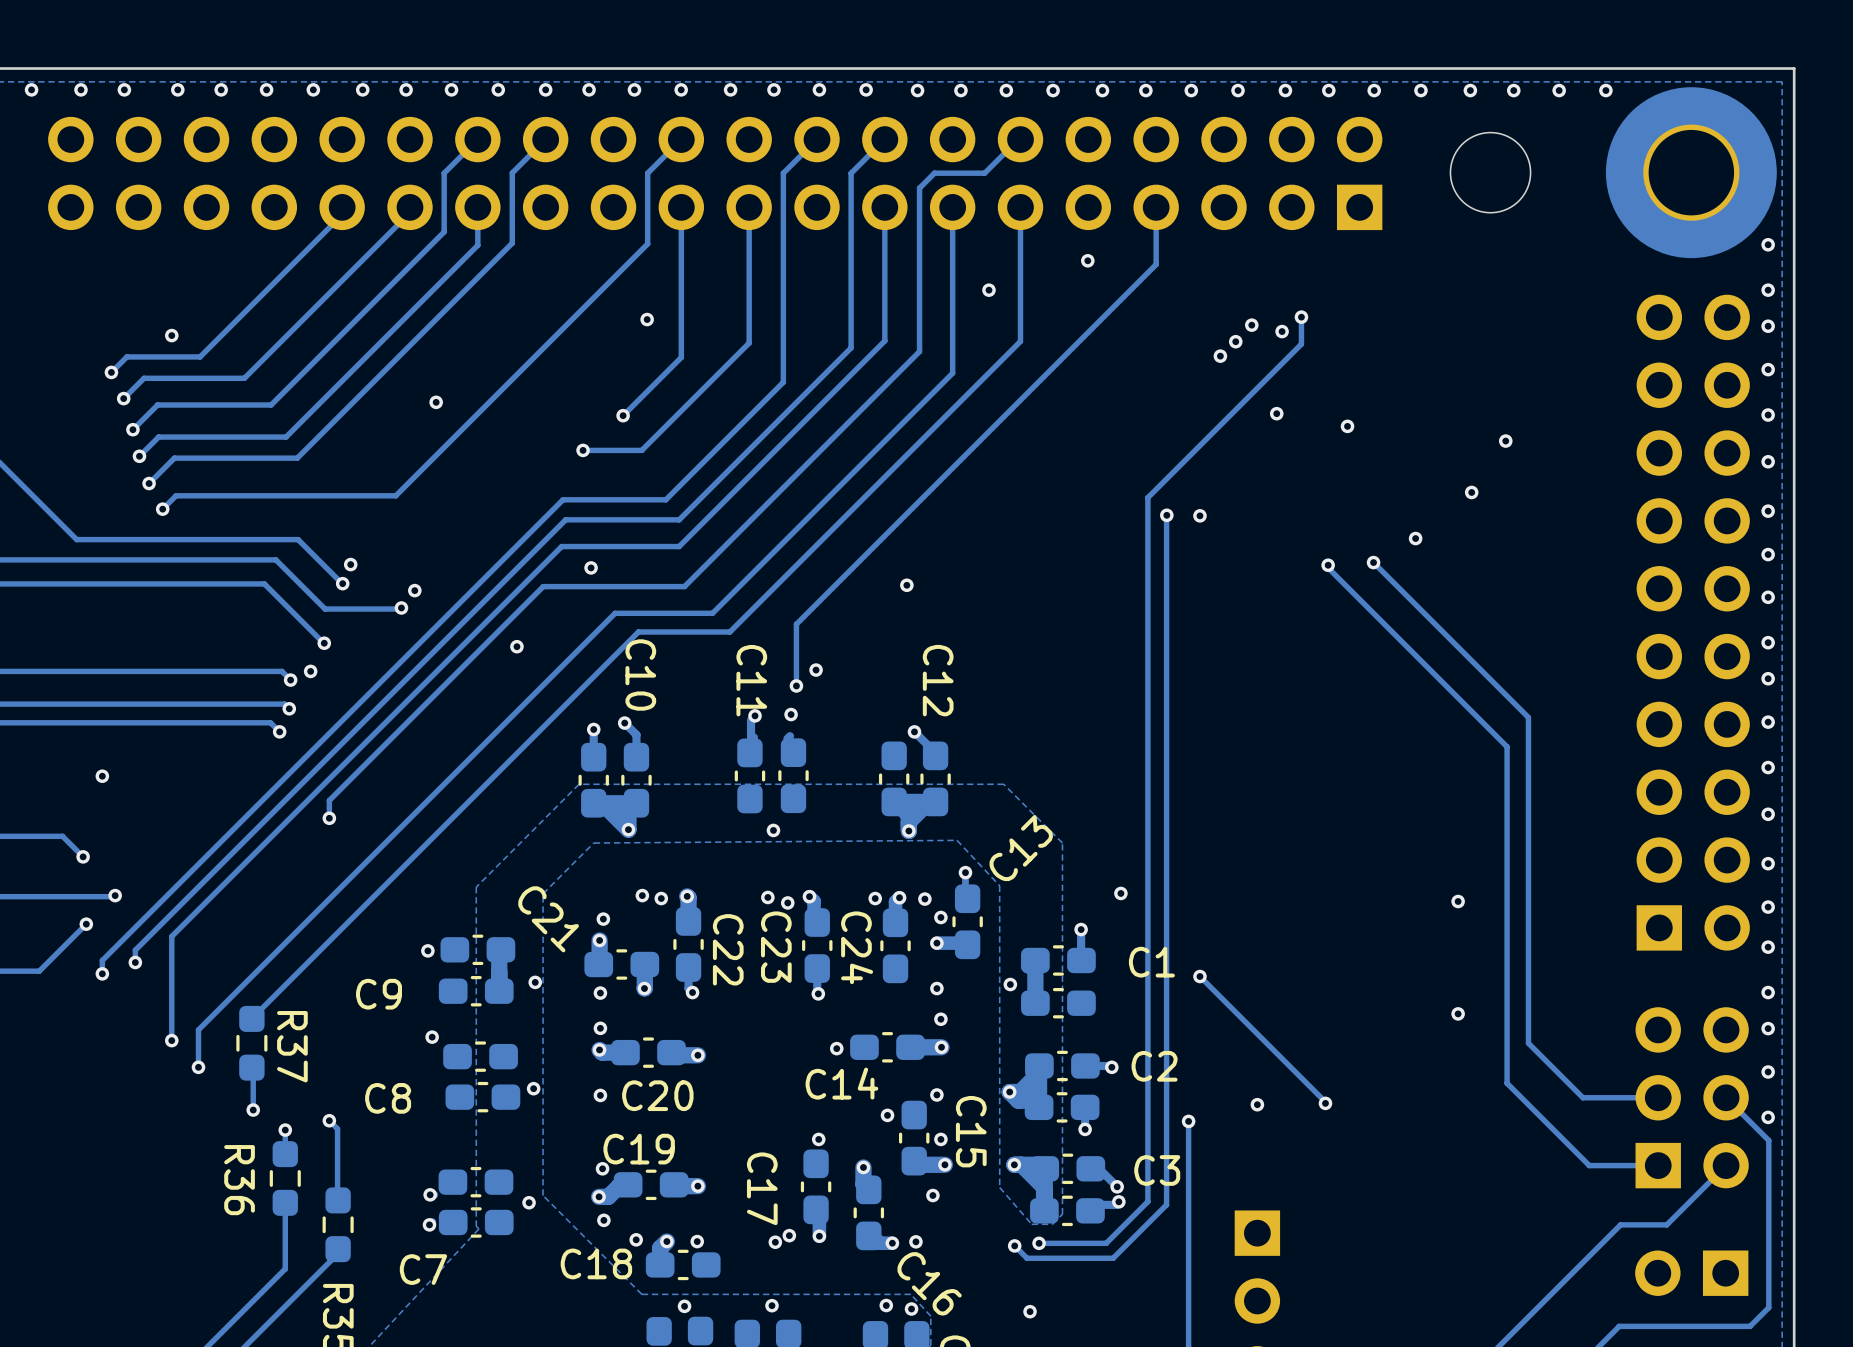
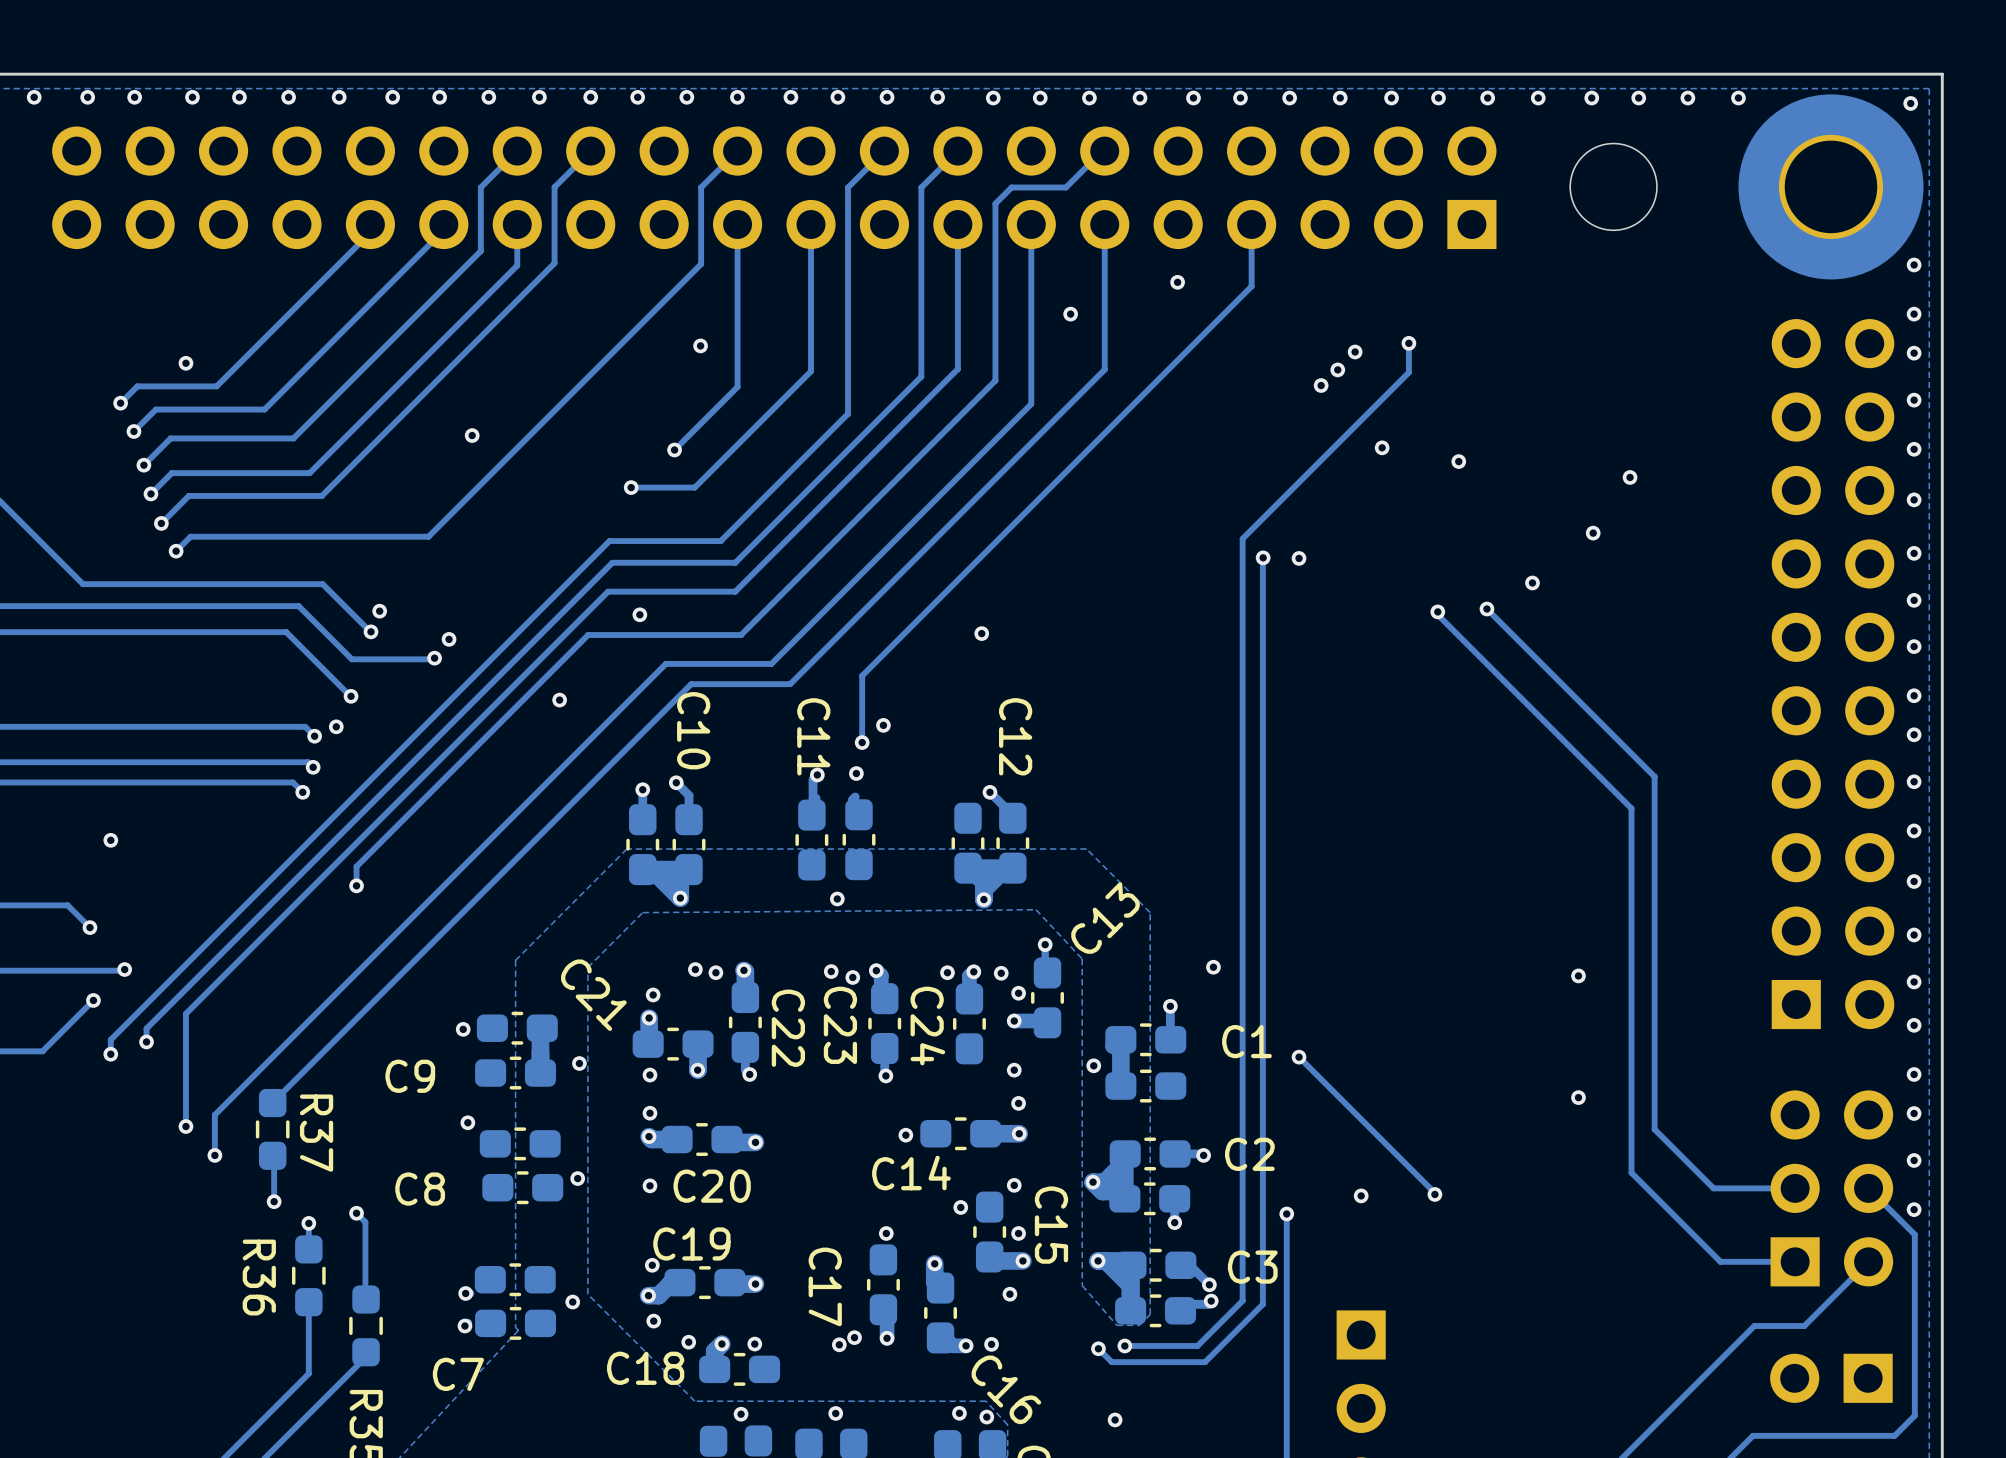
via: none -> (1910, 103)
via: (1282, 331) -> none

